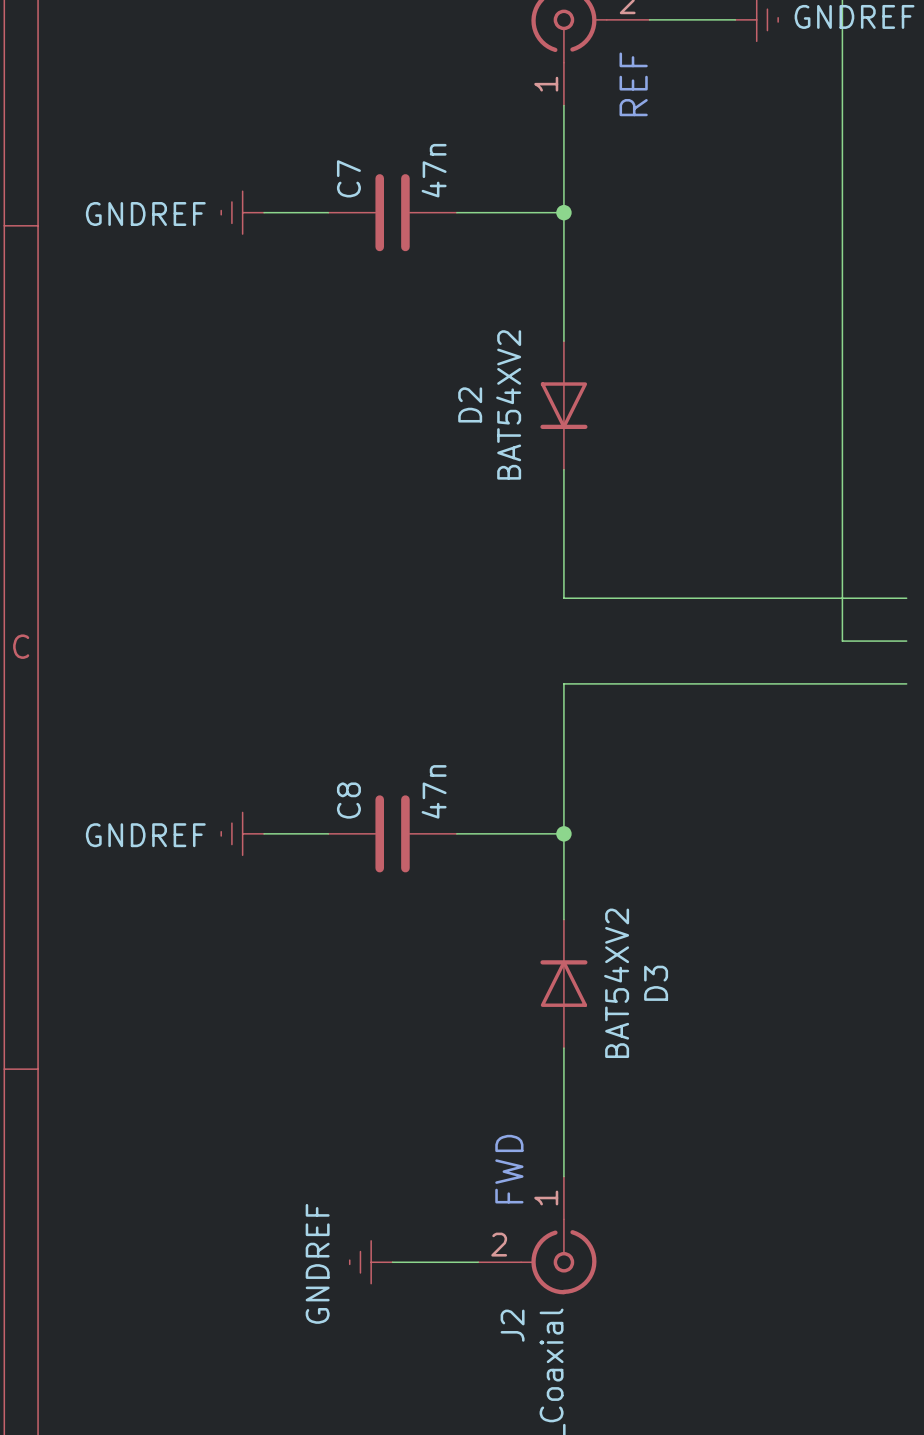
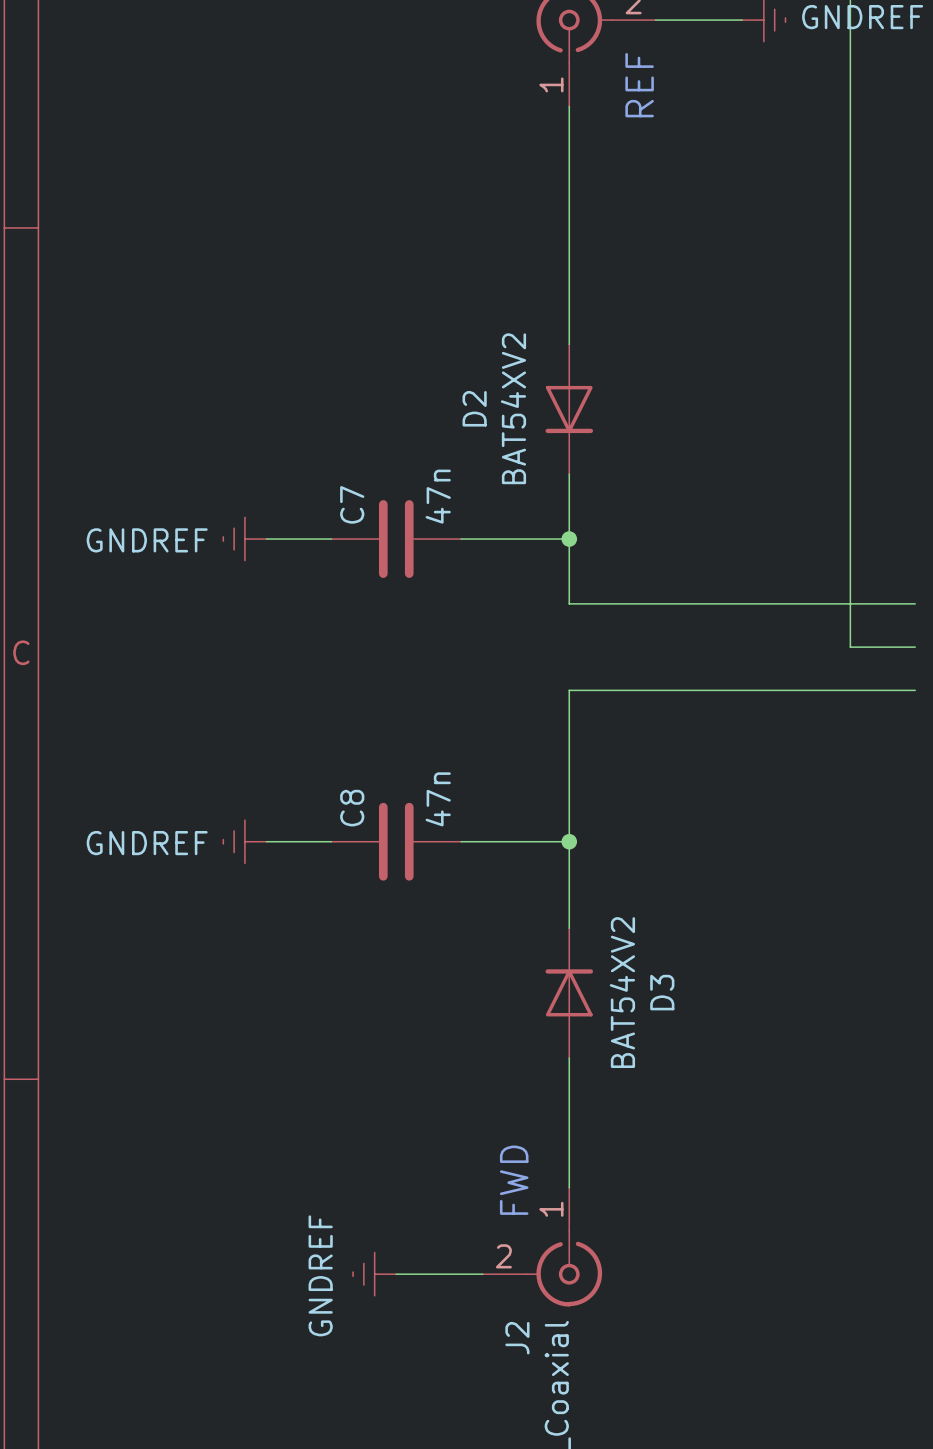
power symbol position: GNDREF (242, 212) -> GNDREF (244, 539)
wire: (264, 212) (328, 212) -> (266, 539) (331, 539)
C7 position: (392, 212) -> (396, 539)
wire: (456, 212) (563, 212) -> (461, 539) (569, 539)
junction: (563, 212) -> none
junction: none -> (569, 539)

